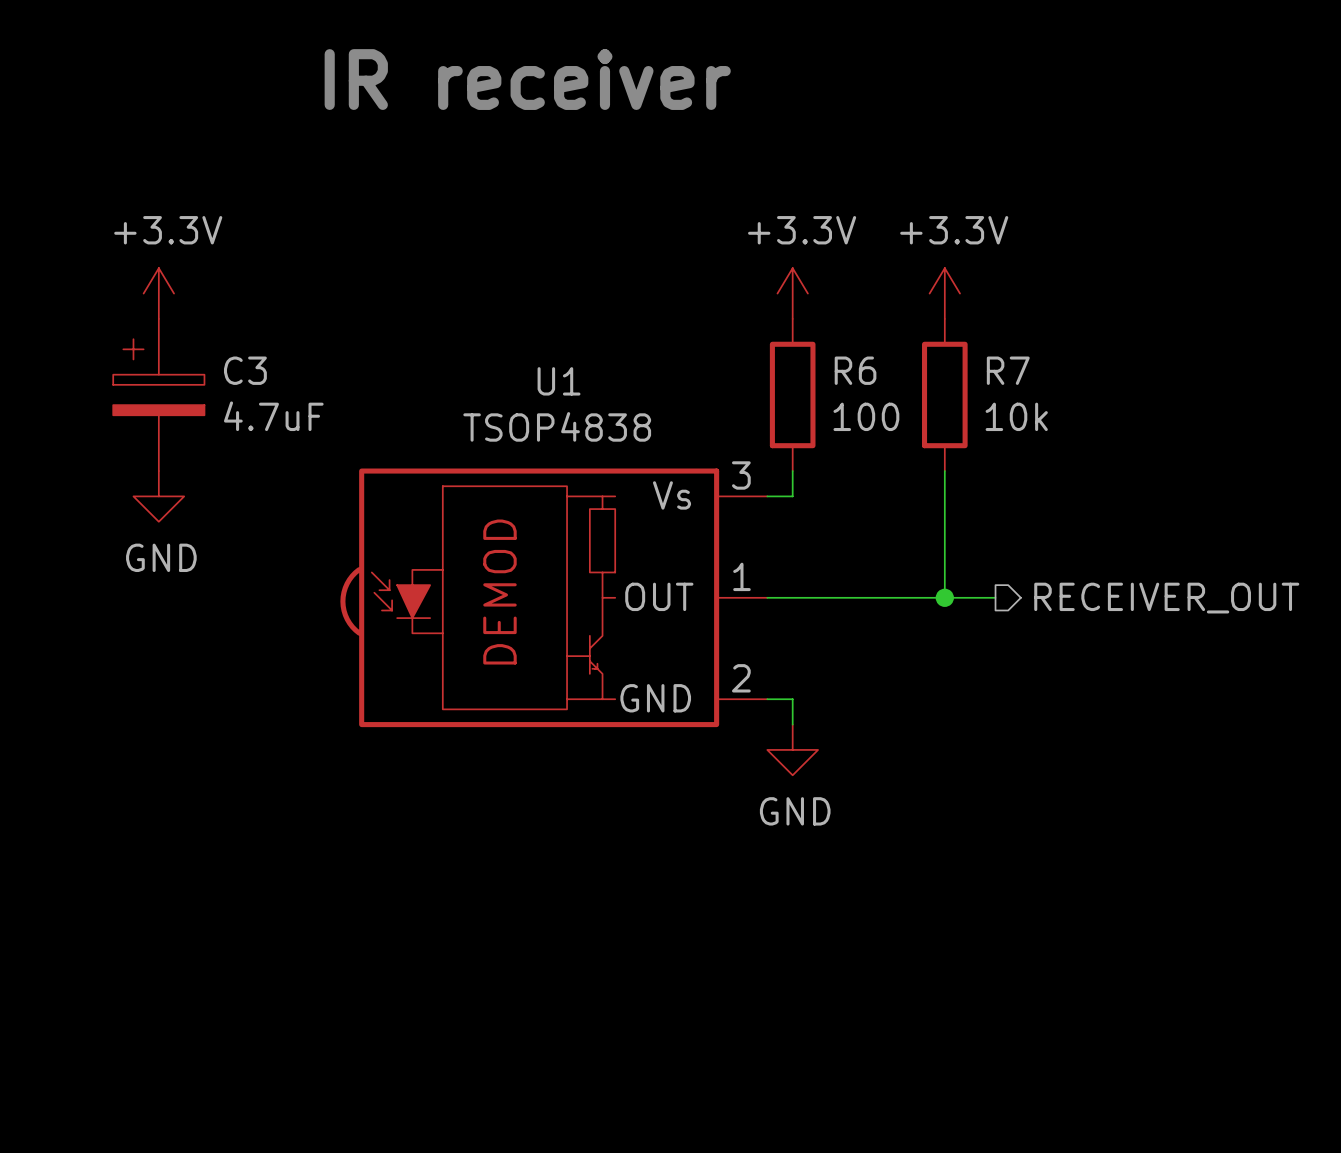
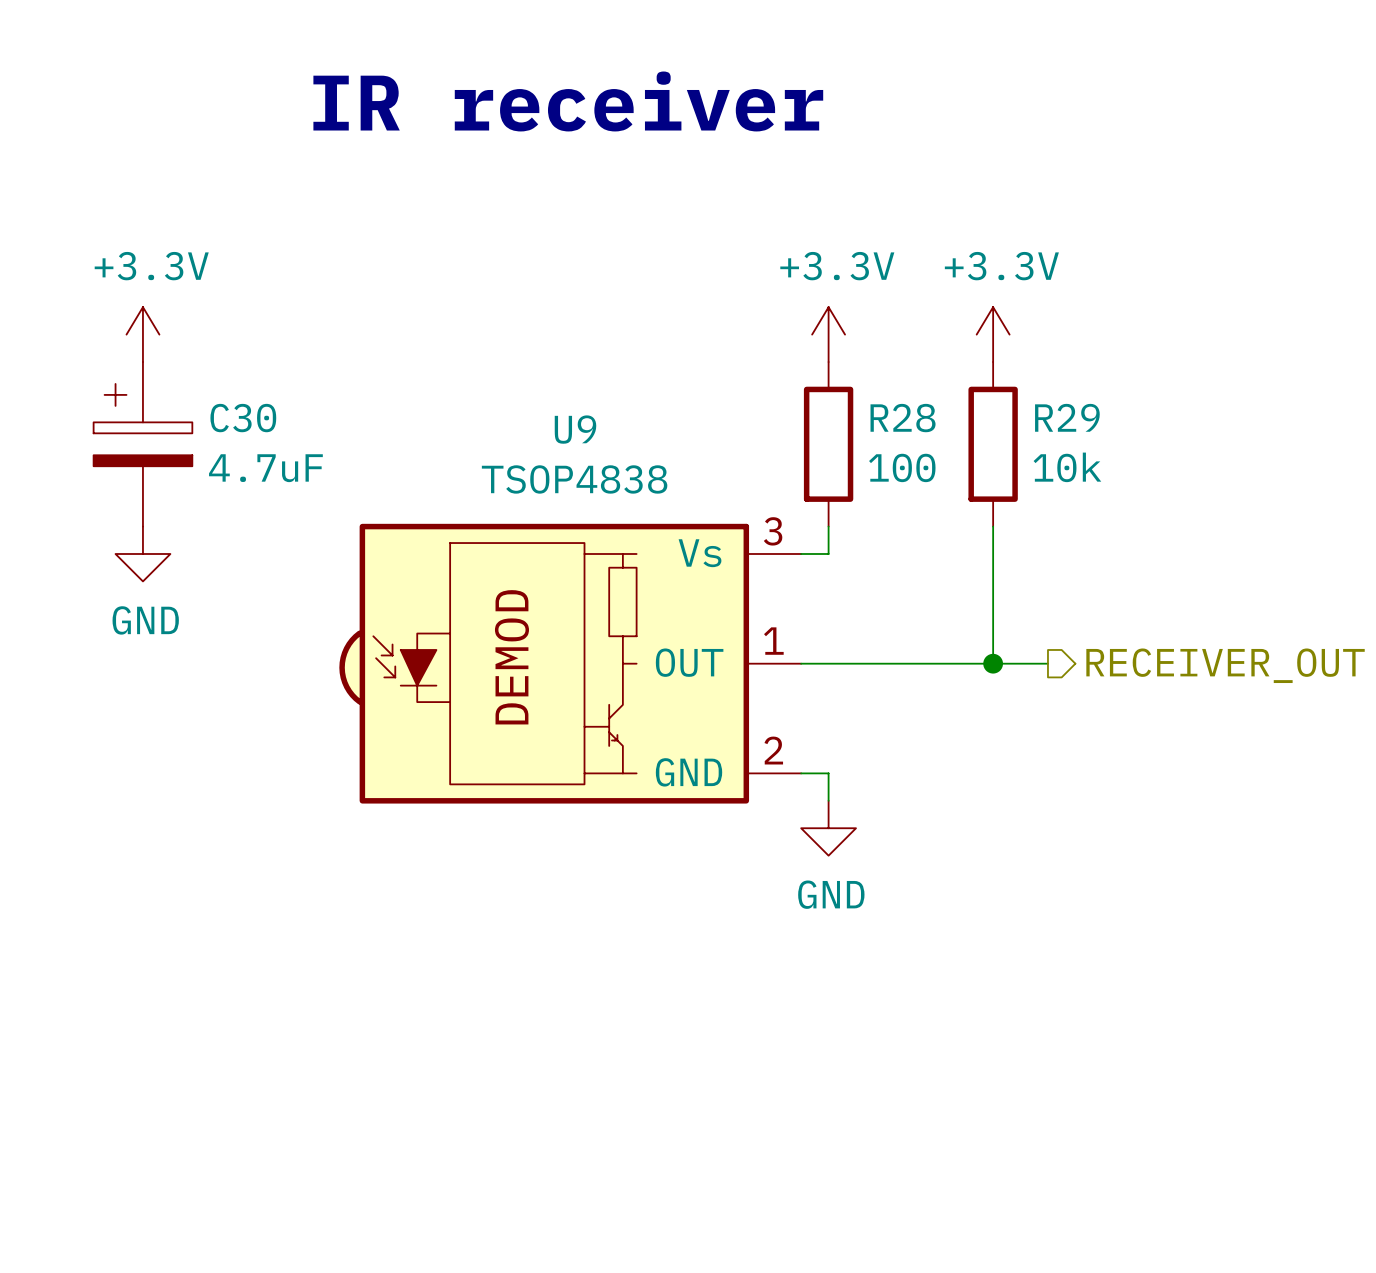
C3 name: C3 (245, 370) -> C30 (243, 418)
R6 name: R6 (855, 370) -> R28 (903, 418)
R7 name: R7 (1008, 370) -> R29 (1067, 417)
U1 name: U1 (559, 381) -> U9 (575, 429)

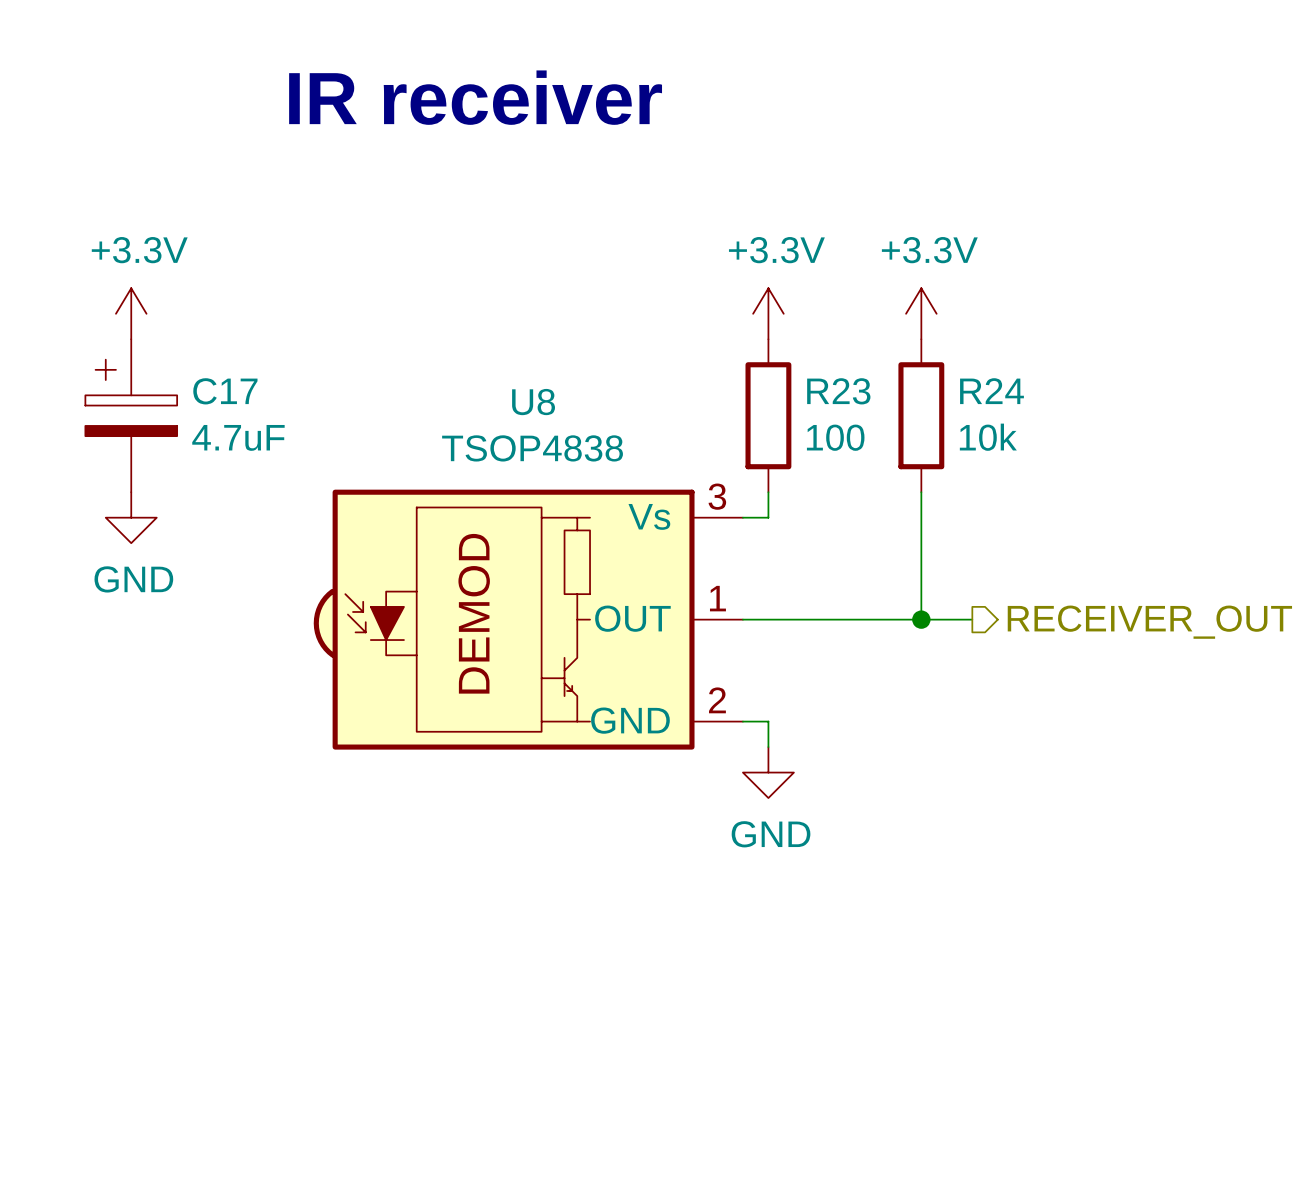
R29 name: R29 (1067, 417) -> R24 (991, 391)
C30 name: C30 (243, 418) -> C17 (225, 391)
R28 name: R28 (903, 418) -> R23 (838, 391)
U9 name: U9 (575, 429) -> U8 (533, 402)

